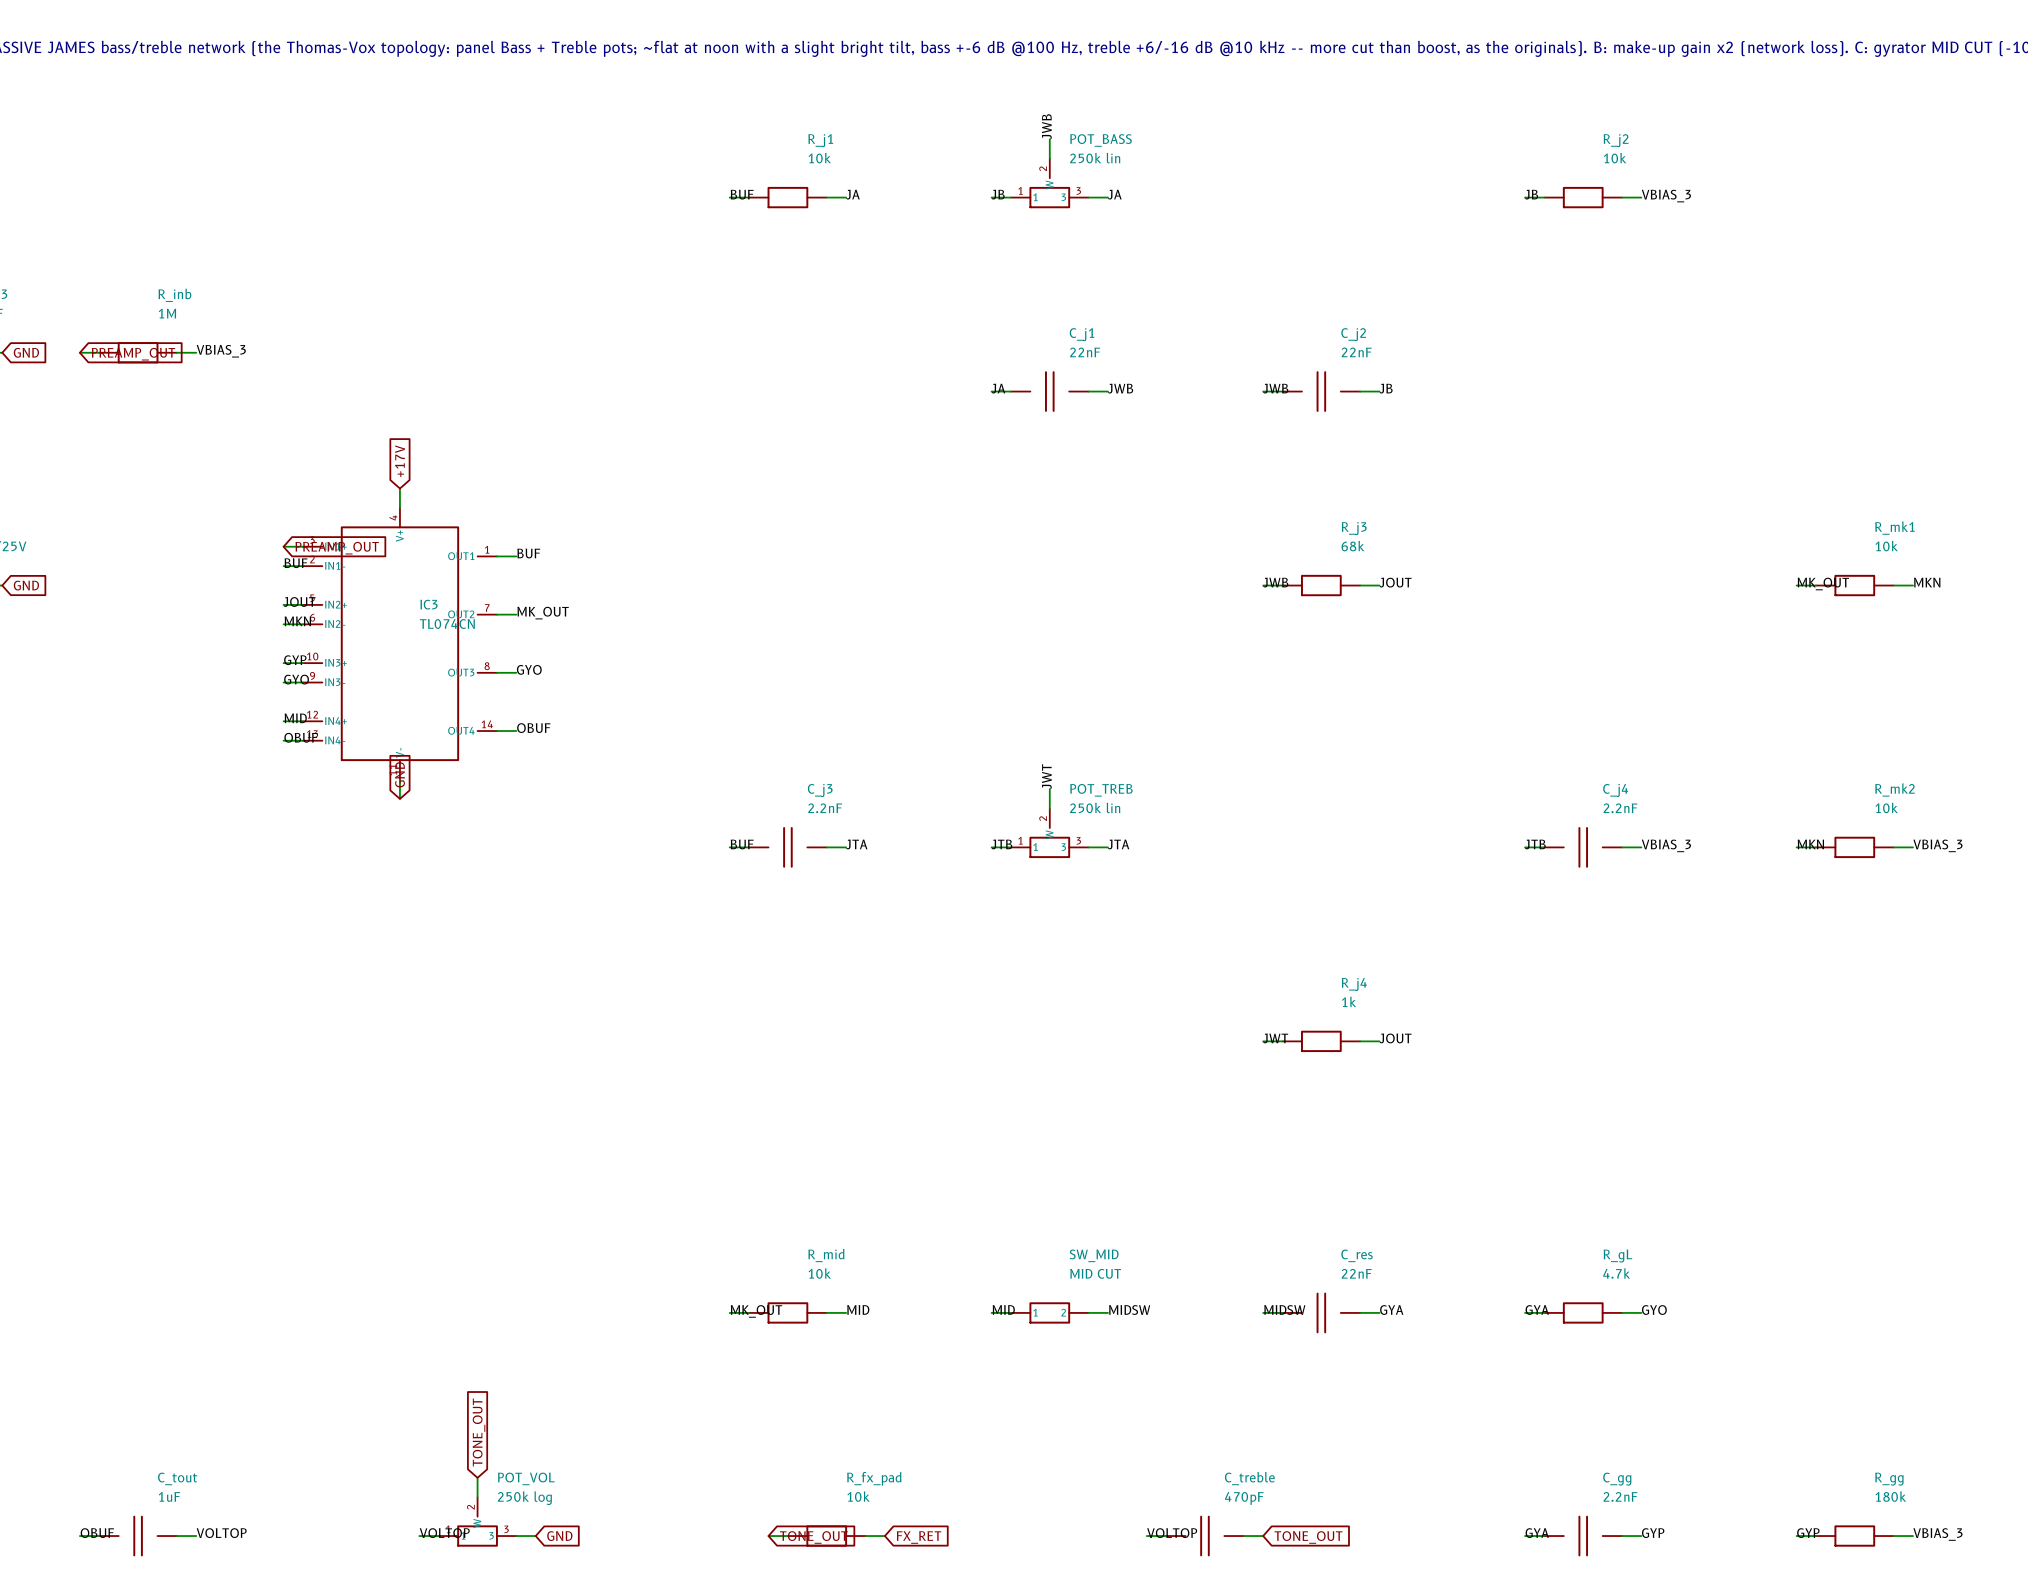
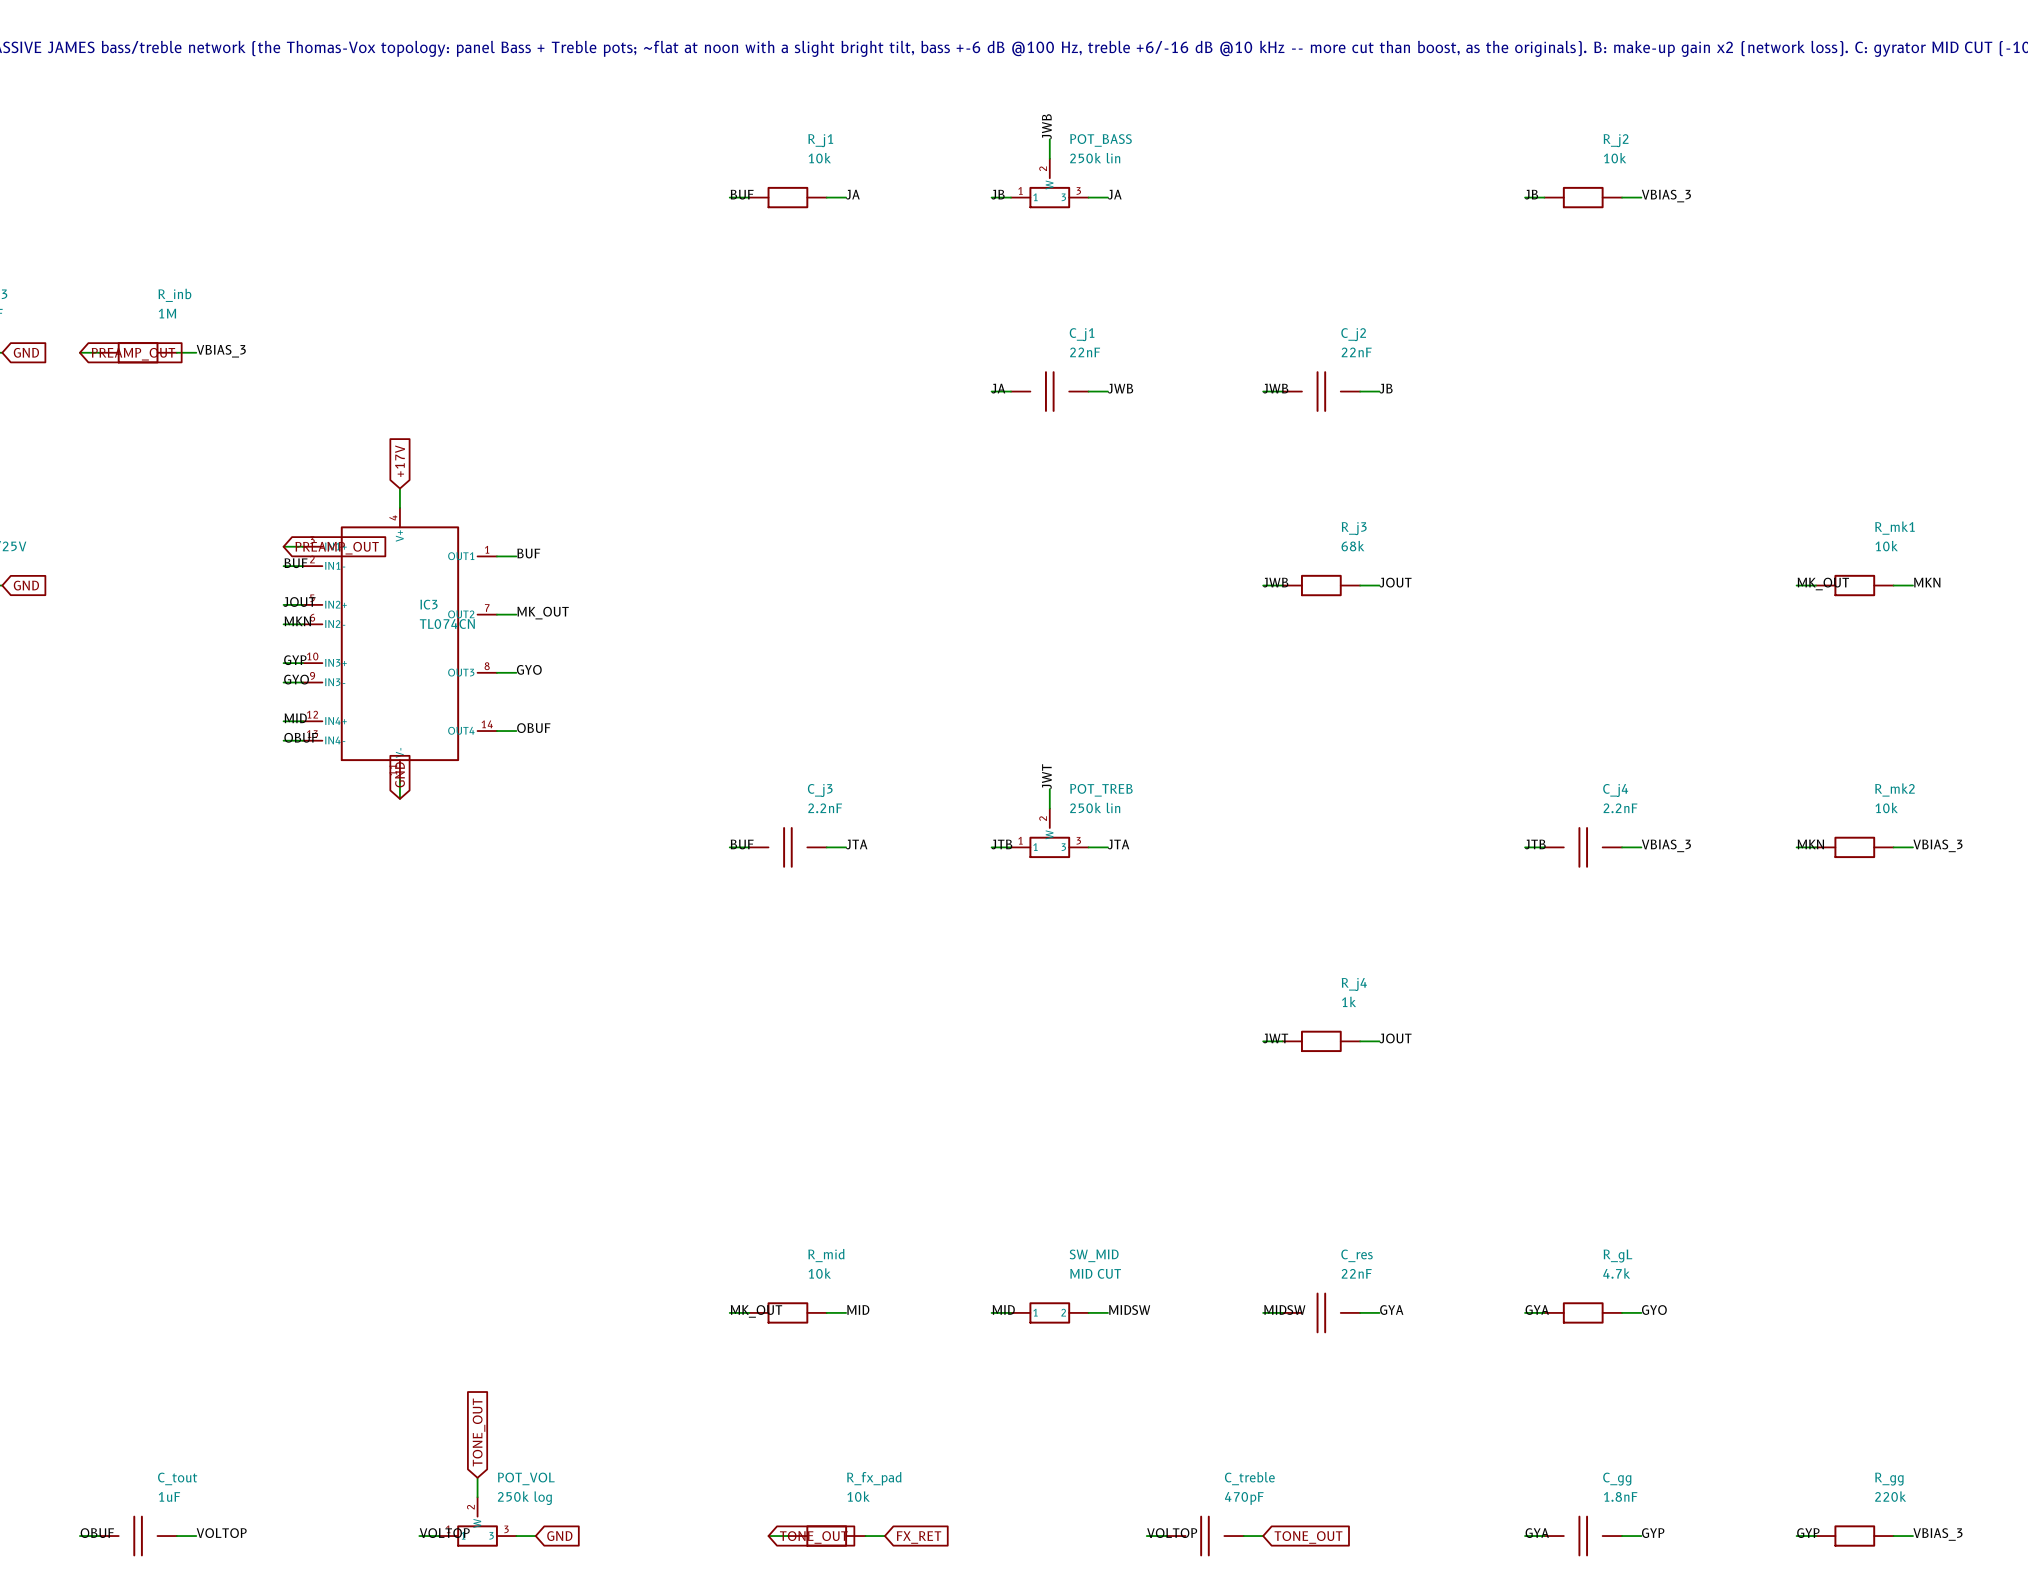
C_gg value: 2.2nF (1620, 1496) -> 1.8nF (1620, 1496)
R_gg value: 180k (1890, 1496) -> 220k (1890, 1496)

